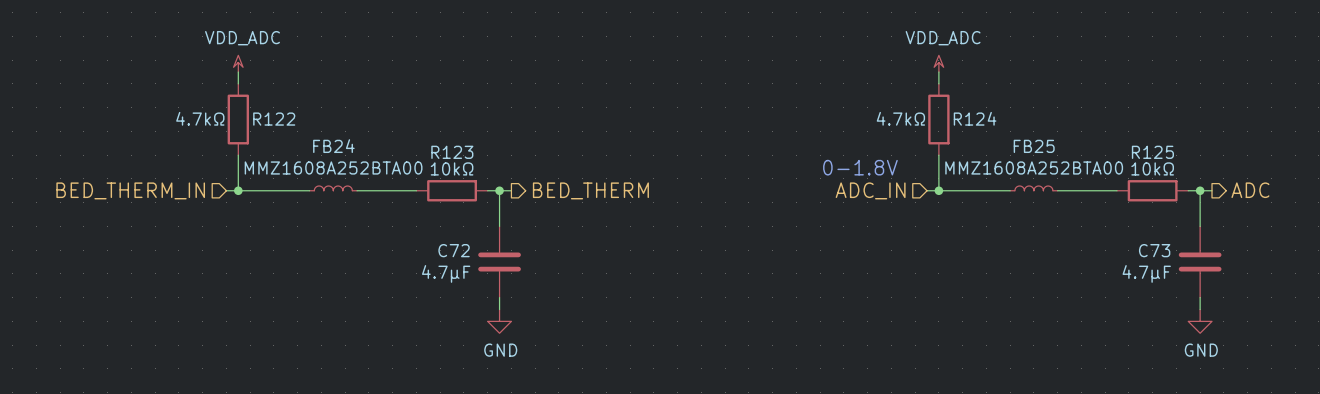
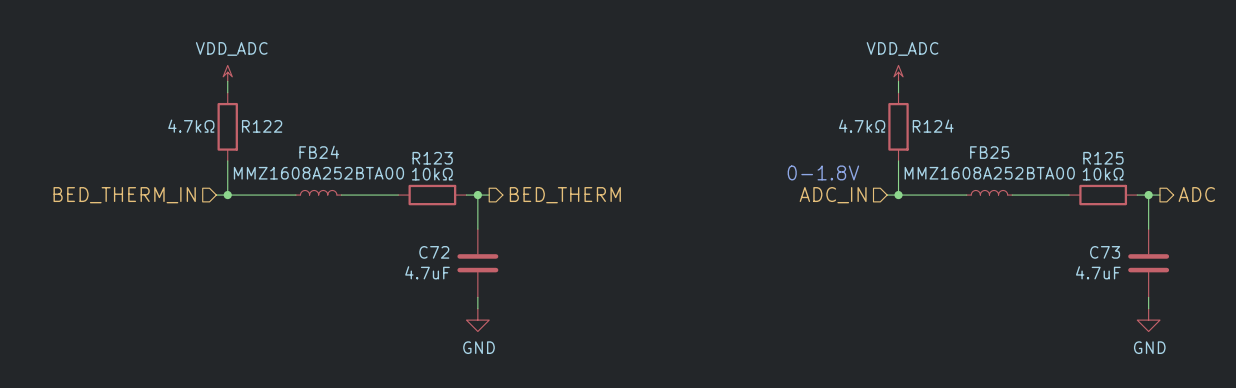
C72 value: 4.7μF (446, 273) -> 4.7uF (427, 272)
C73 value: 4.7μF (1146, 273) -> 4.7uF (1098, 272)

